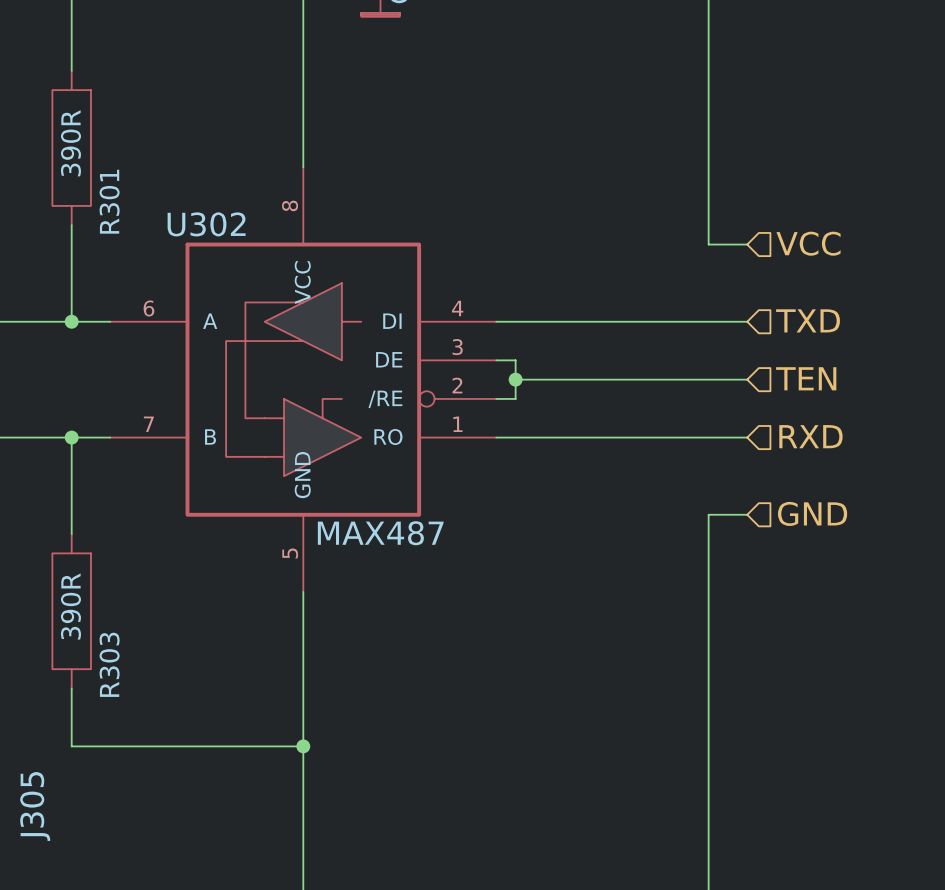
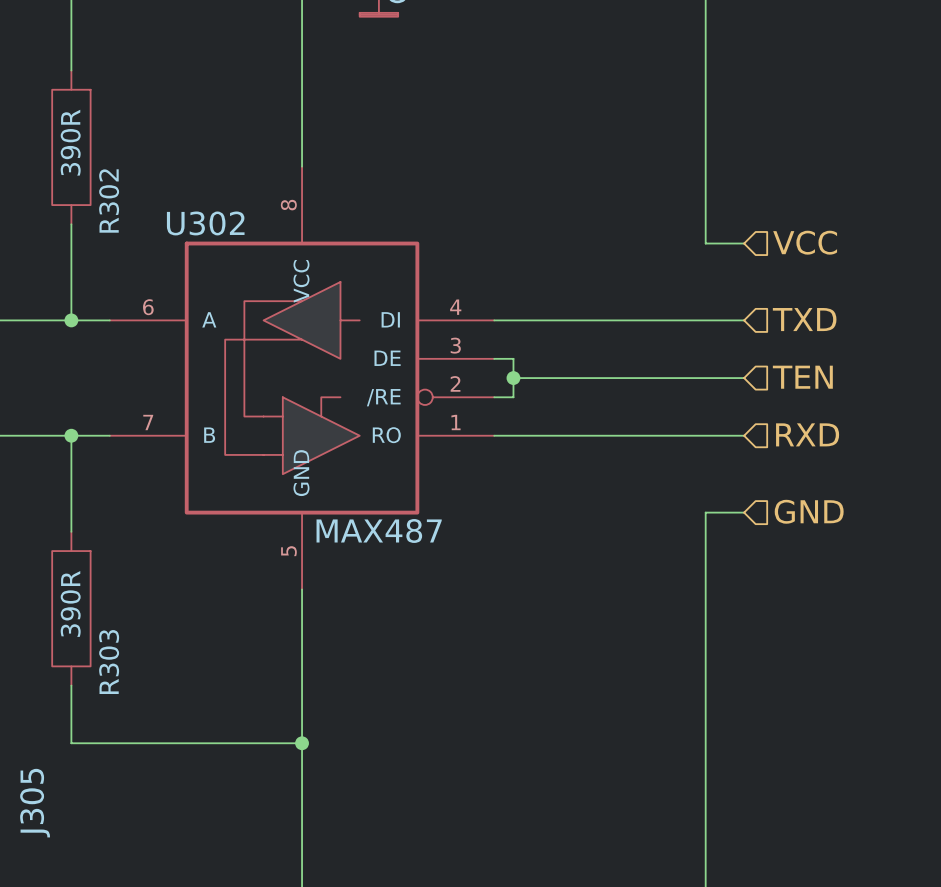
R301 name: R301 (109, 201) -> R302 (109, 200)

